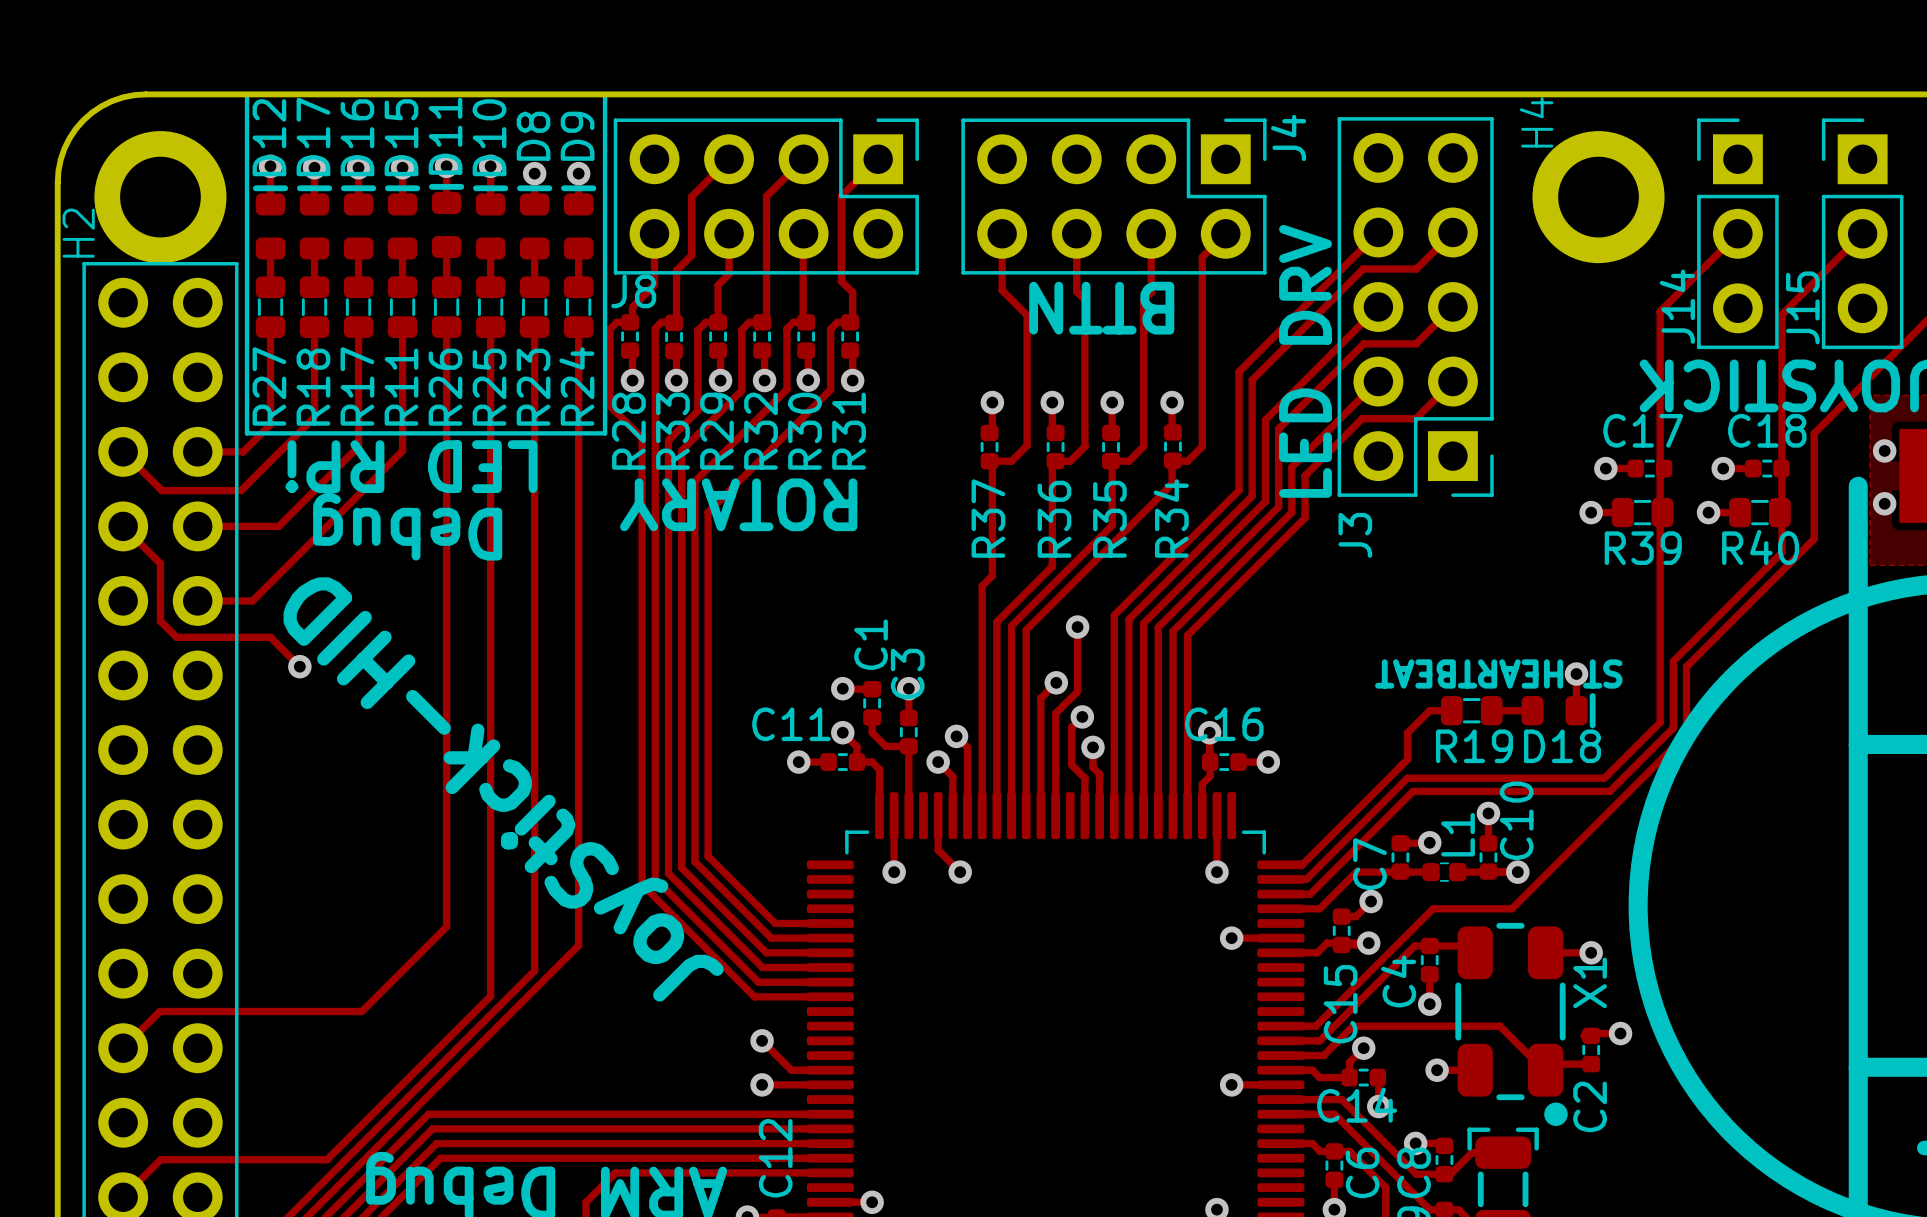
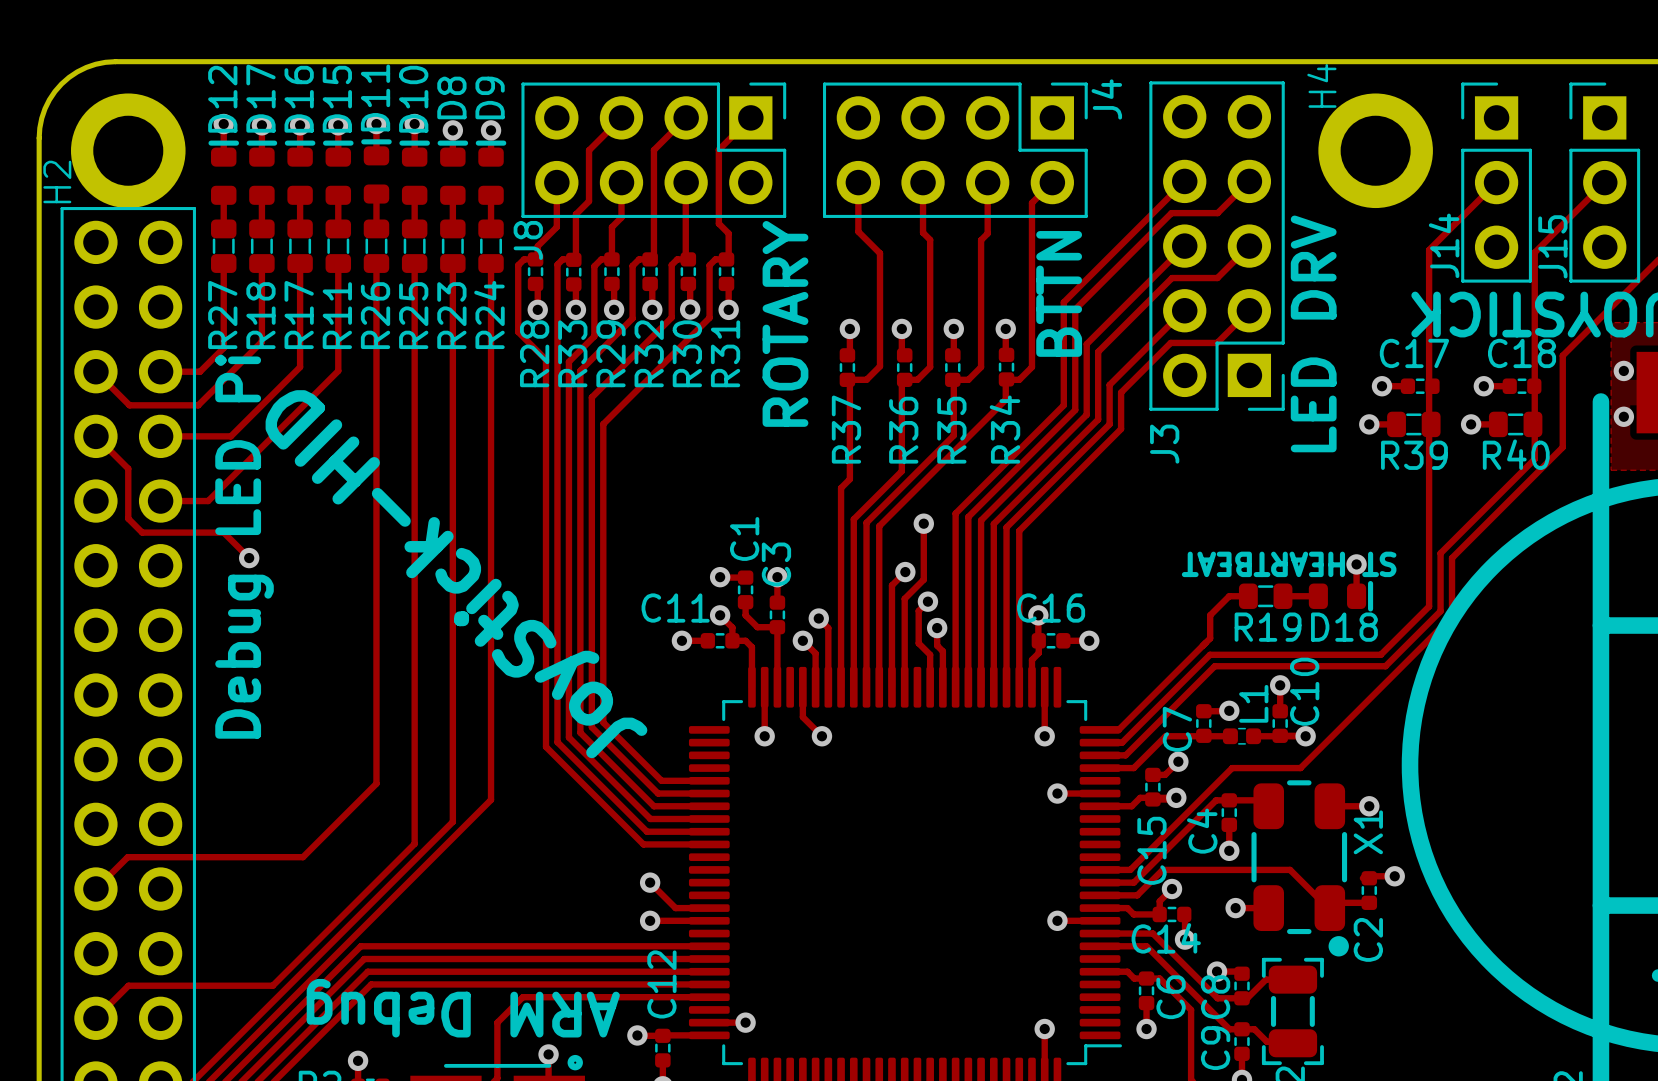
line: (247, 95) (247, 433) (605, 433) (605, 95) -> none
J8 name rotation: 0° (633, 291) -> 90° counterclockwise (528, 240)
text rotation: 0° (1101, 308) -> 90° clockwise (1059, 293)
text position: LED DRV (1305, 361) -> LED DRV (1313, 333)
text: LED RPi (411, 466) -> Debug LED Pi (244, 546)
text rotation: 0° (738, 504) -> 90° clockwise (785, 323)
text: Debug (407, 526) -> none
text position: JoyStick-HID (503, 789) -> JoyStick-HID (456, 574)

